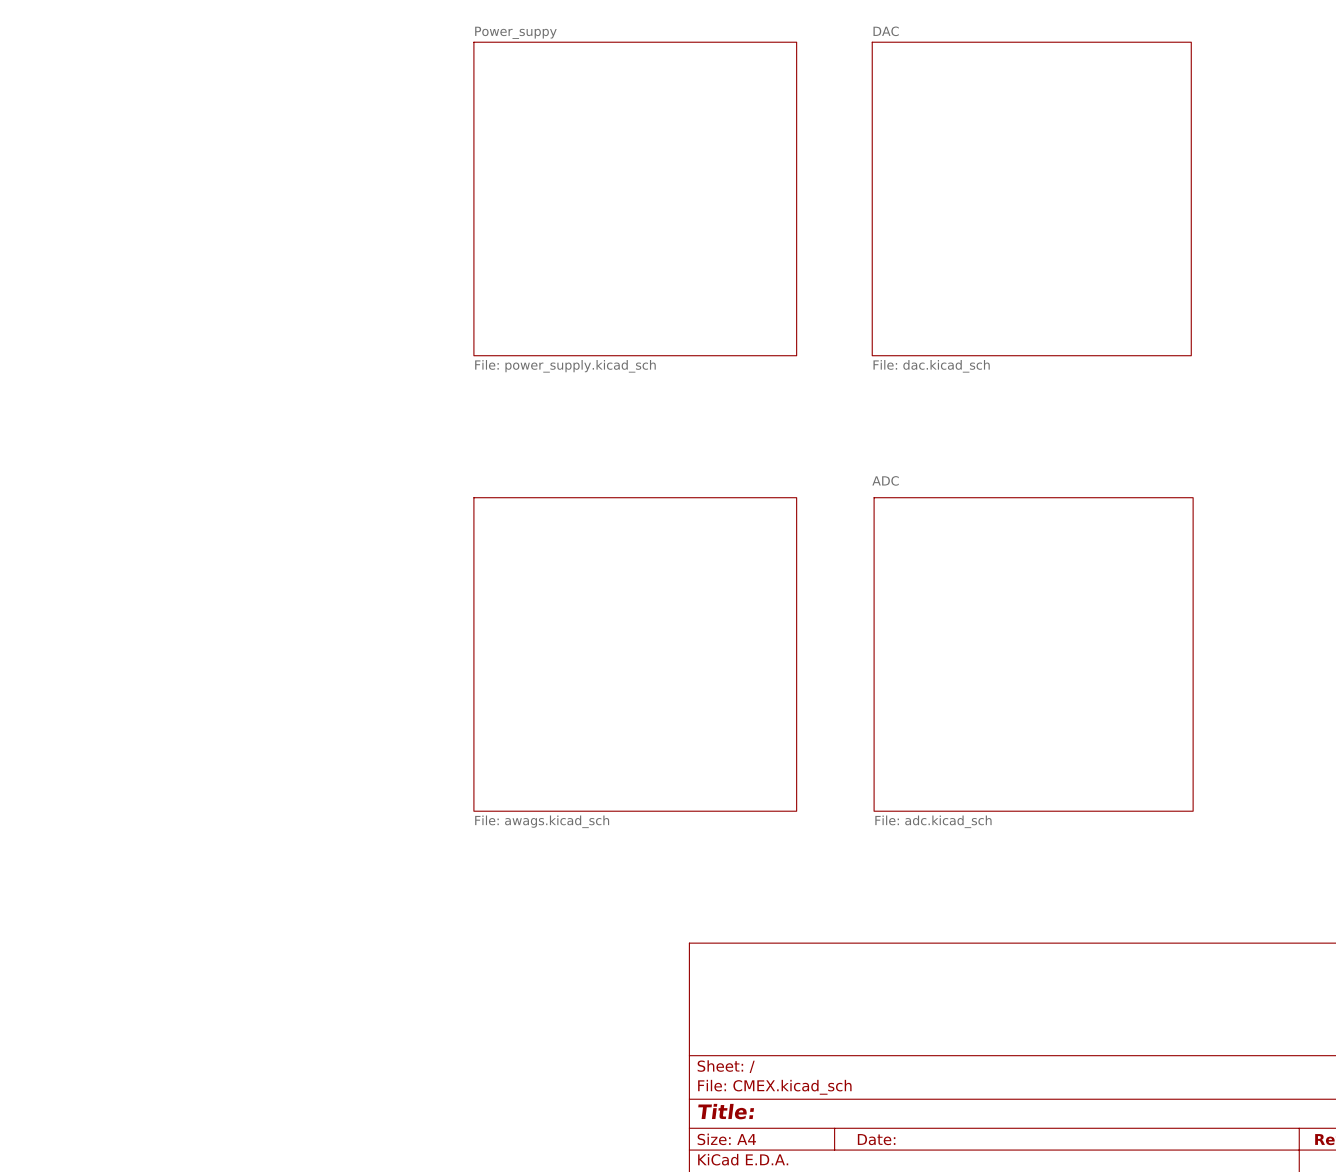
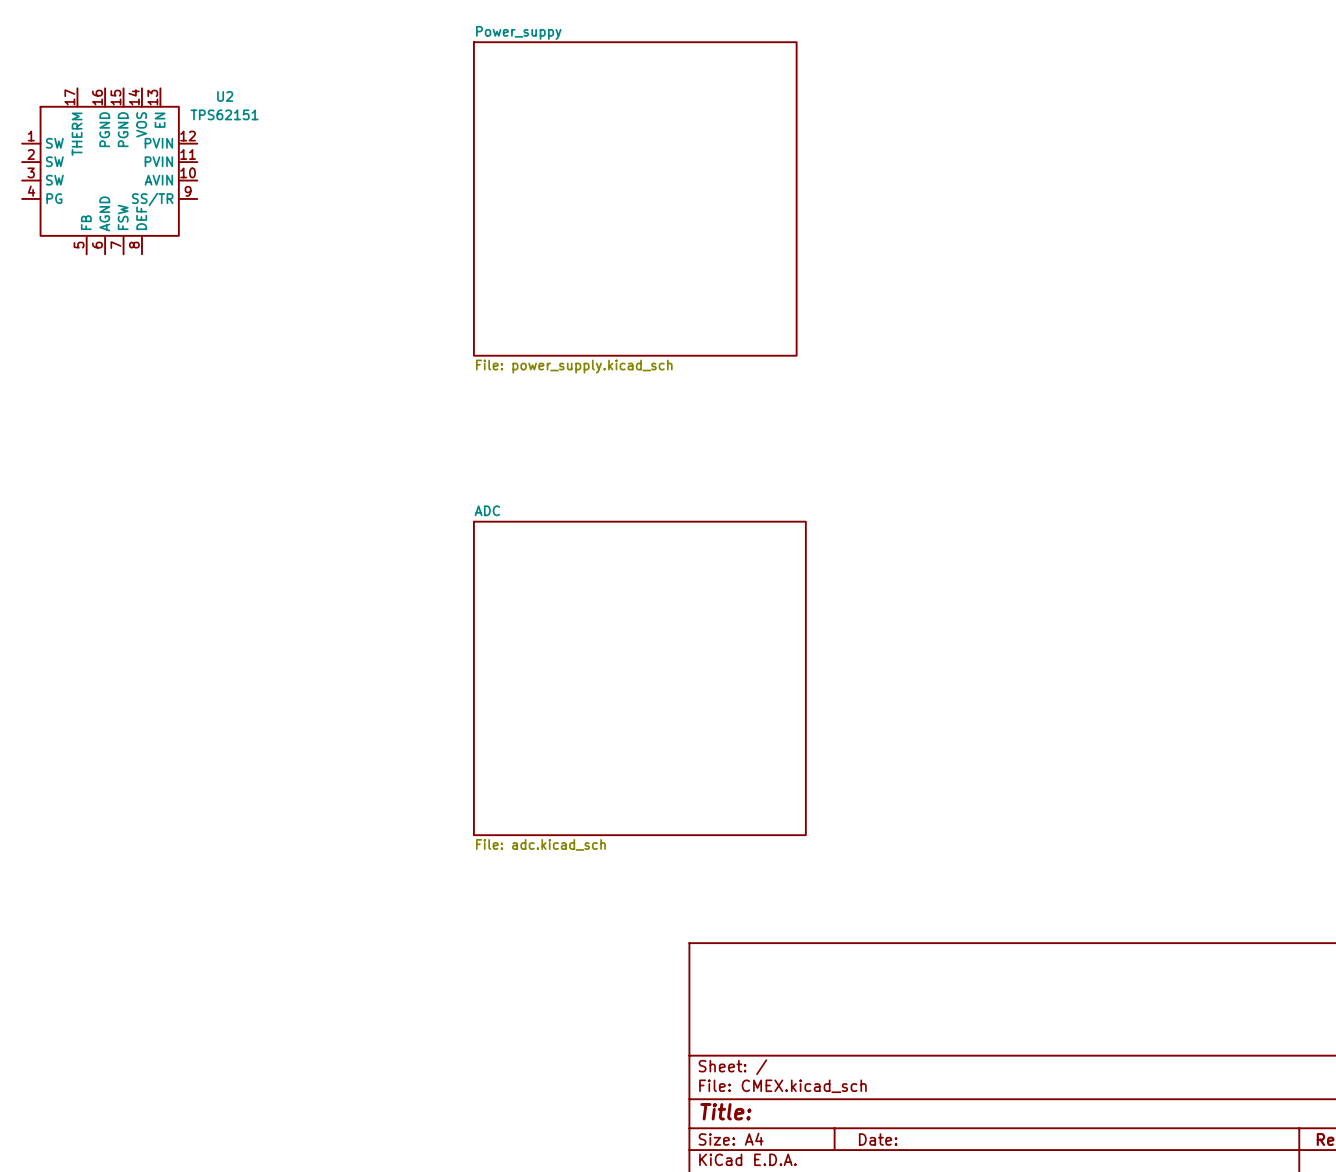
U2: none -> TPS62151 (109, 171)
sheet DAC: File: dac.kicad_sch (1031, 198) -> none
sheet: File: awags.kicad_sch (635, 654) -> none
sheet ADC: File: adc.kicad_sch (1033, 654) -> none
sheet ADC: none -> File: adc.kicad_sch (639, 678)

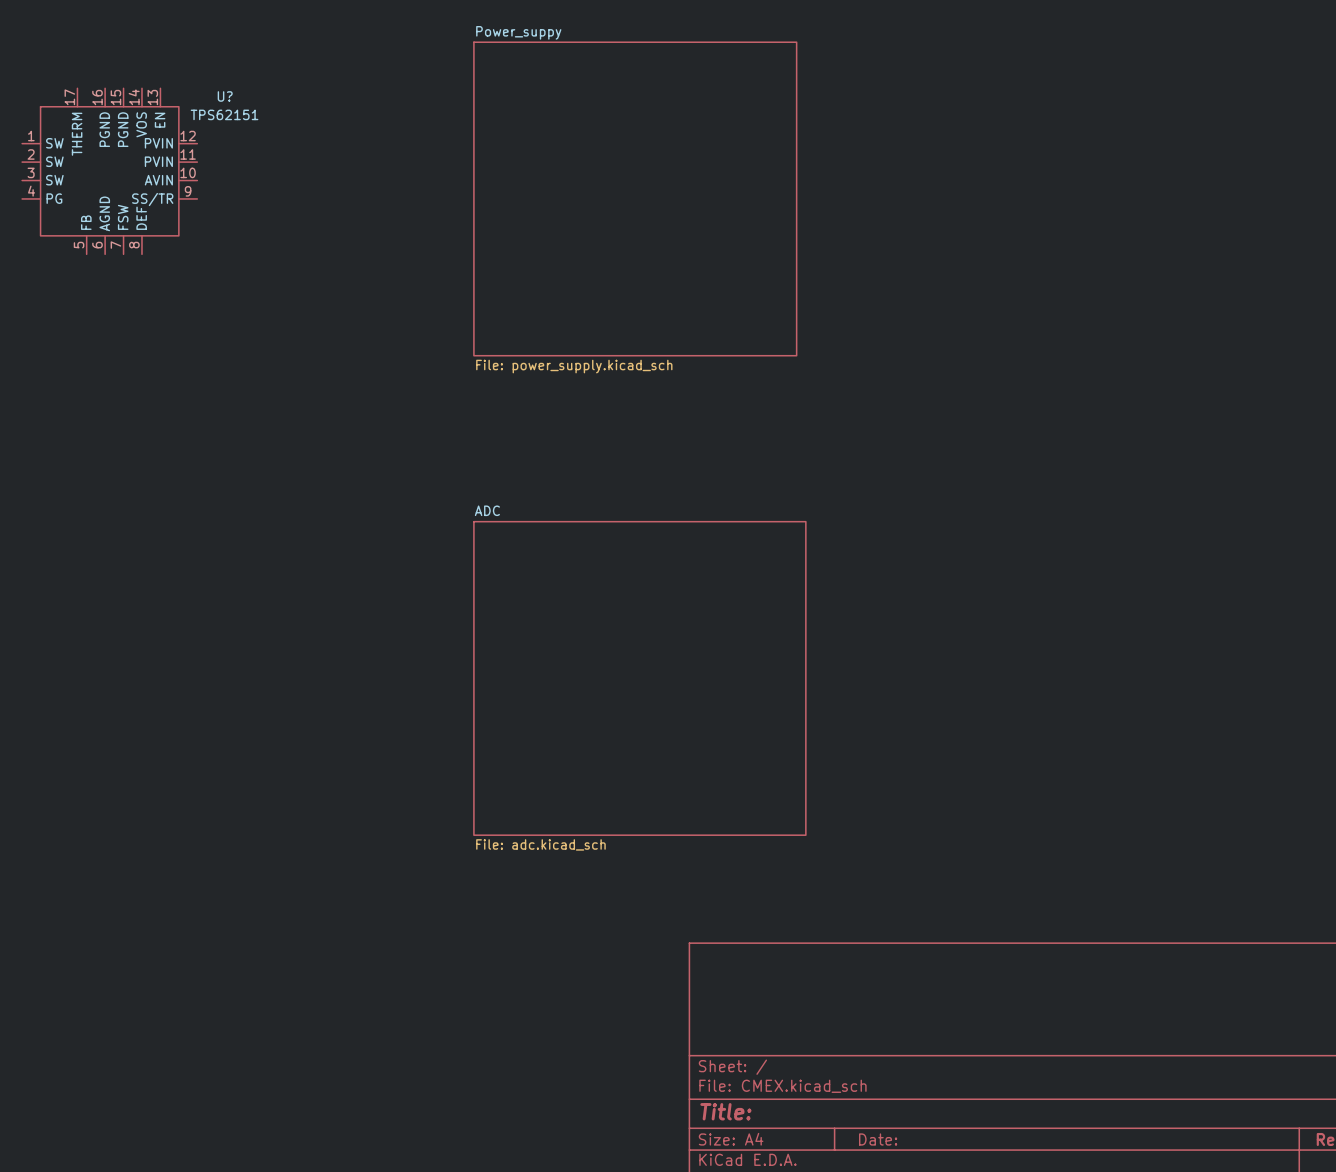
U2 name: U2 (225, 96) -> U? (225, 96)

